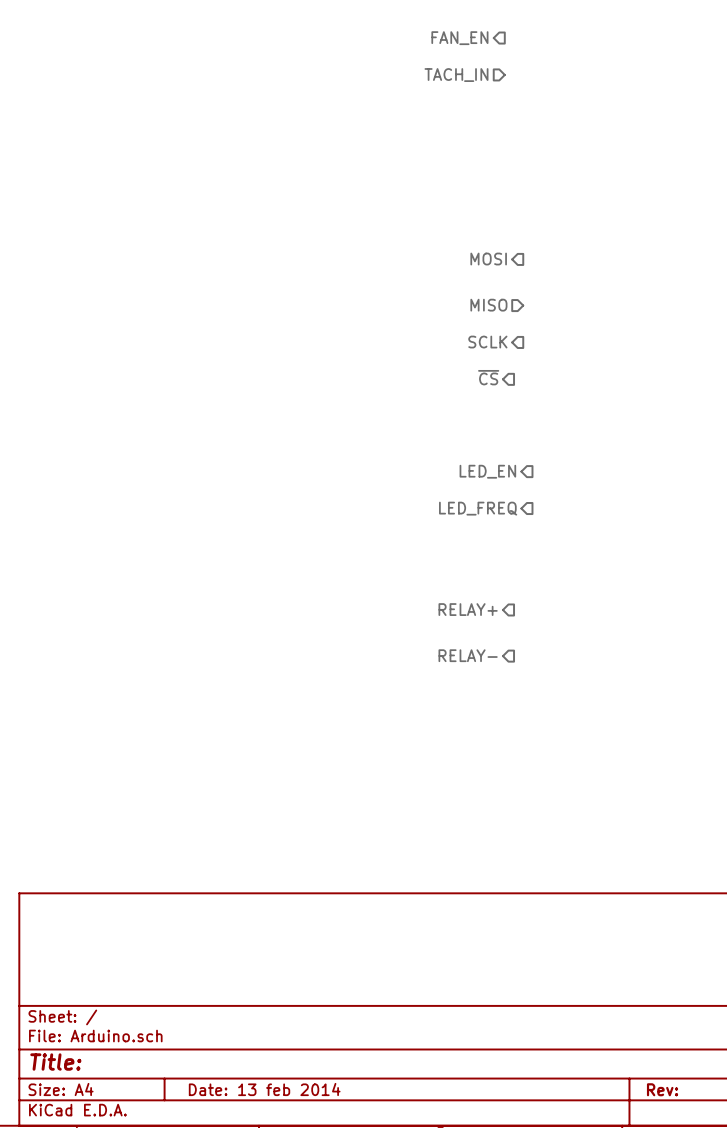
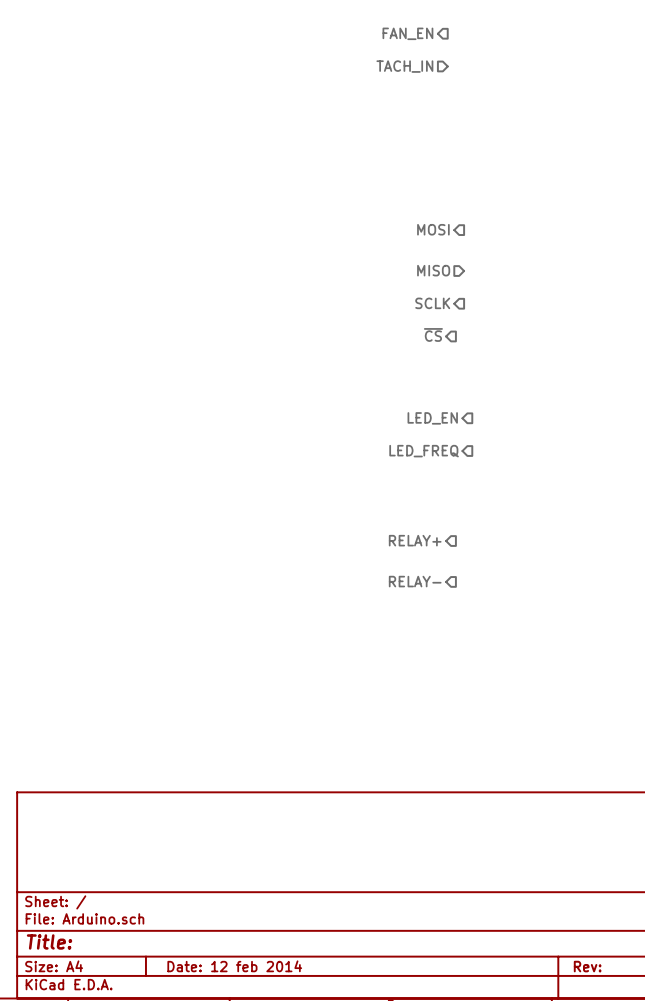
title block: Date: 13 feb 2014 (264, 1089) -> Date: 12 feb 2014 (234, 966)

